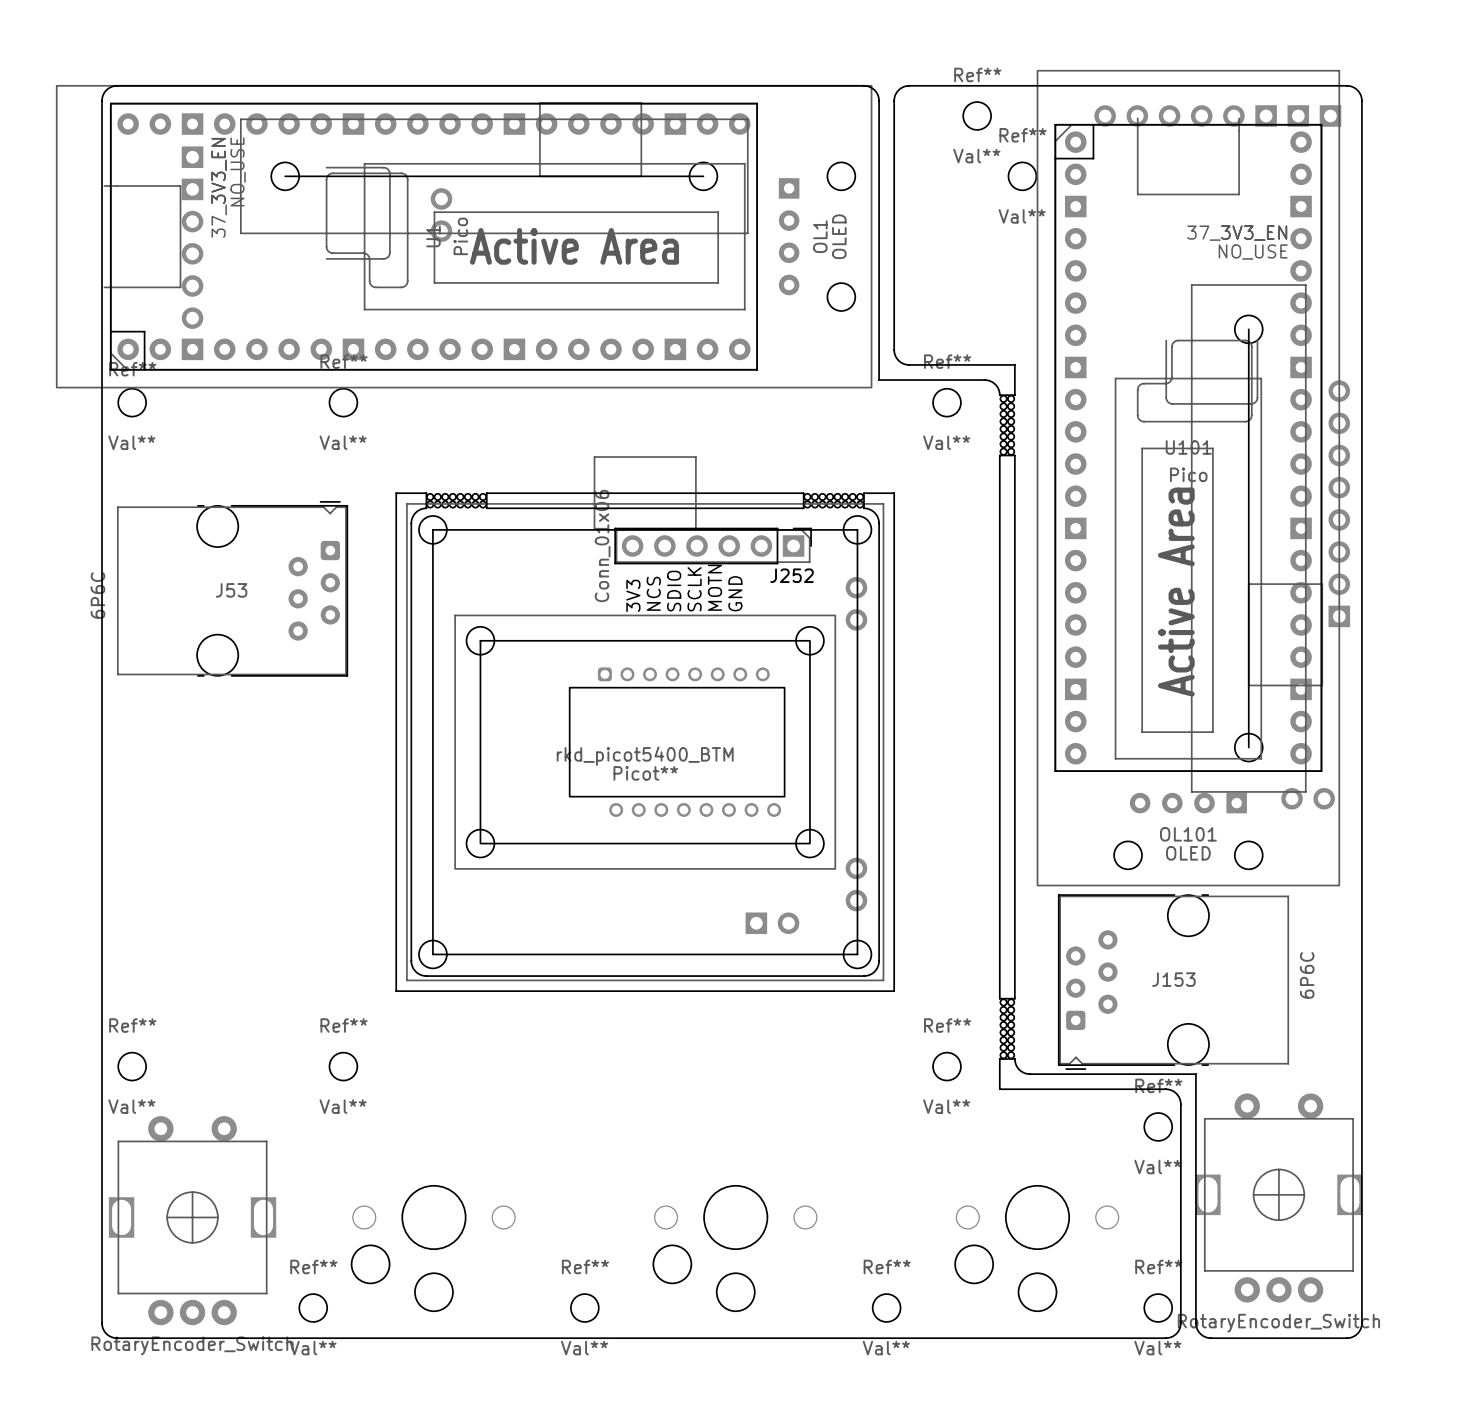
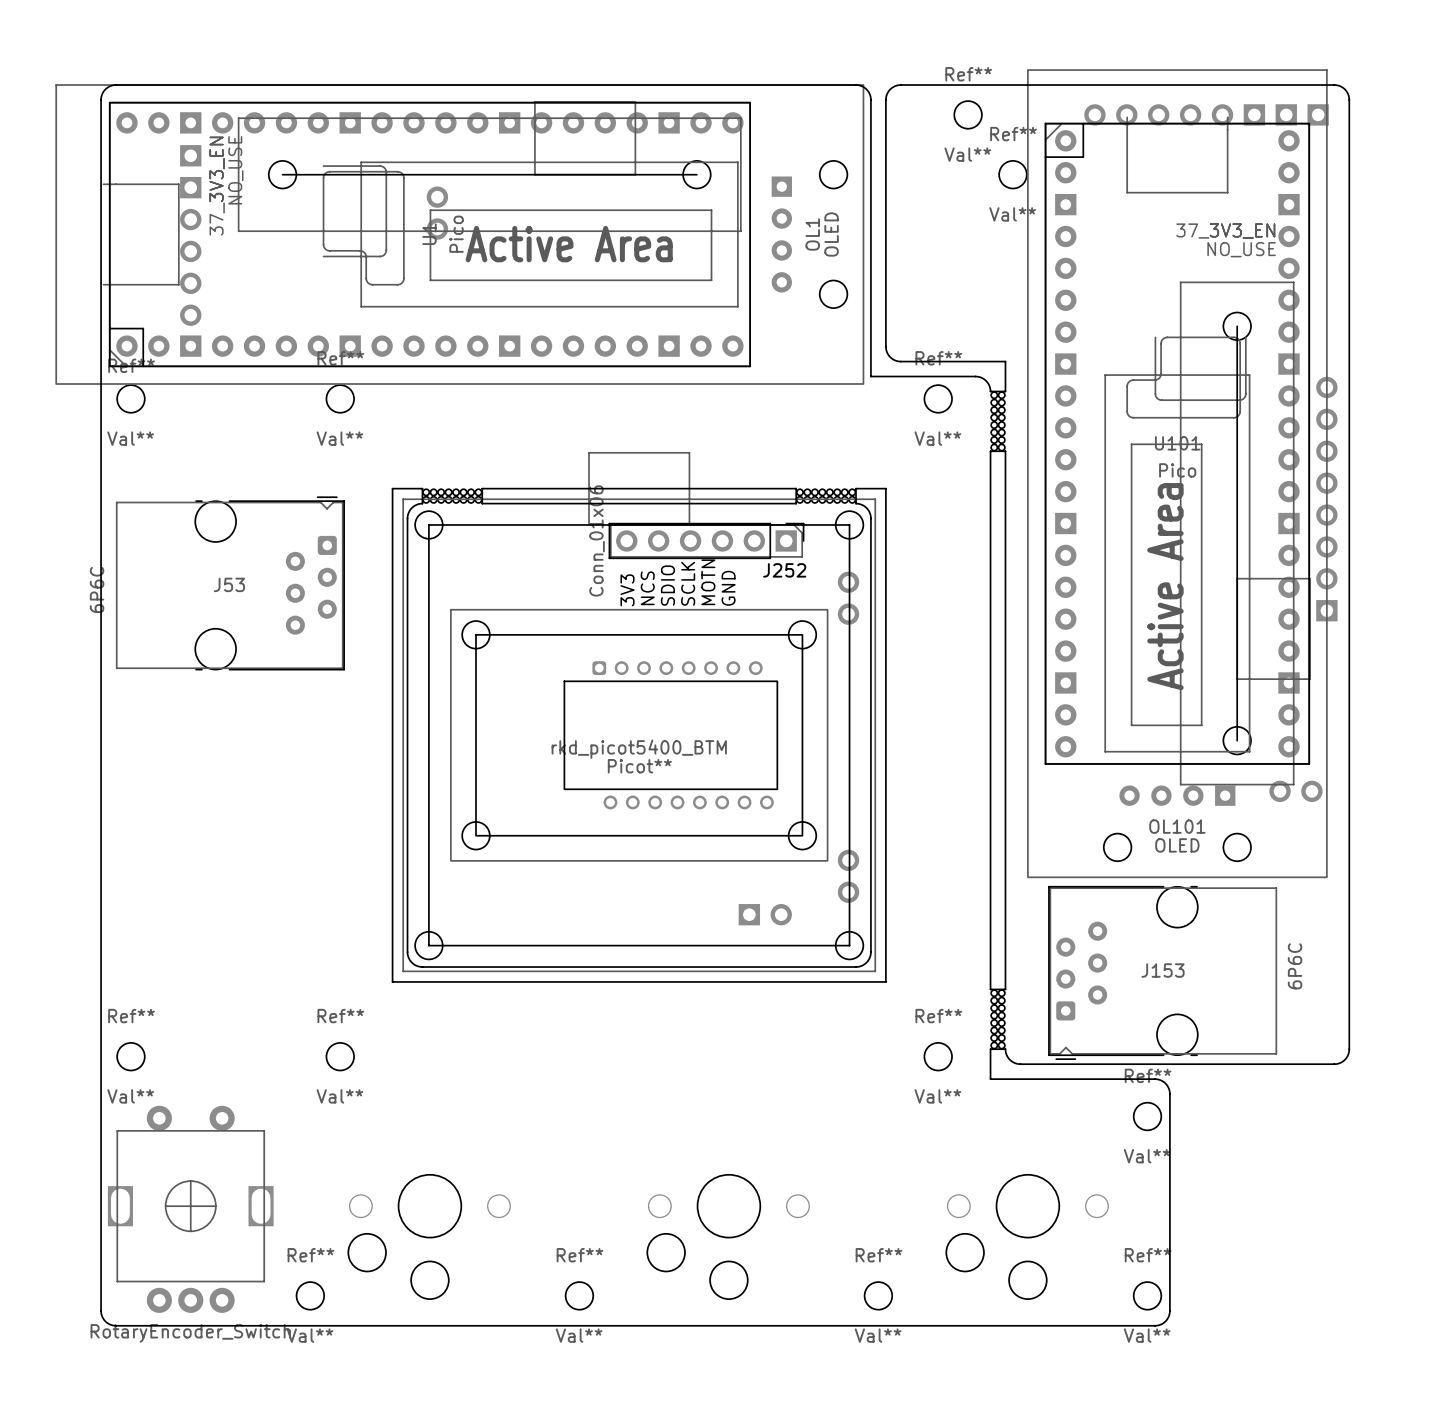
board edge: (1361, 1058) (1361, 1323) (1357, 1333) (1348, 1338) (1211, 1338) (1203, 1336) (1197, 1330) (1195, 1323) (1195, 1074) -> (1349, 1049) (1344, 1059) (1336, 1064) (1184, 1064)
part: RotaryEncoder_Switch (1278, 1198) -> none

